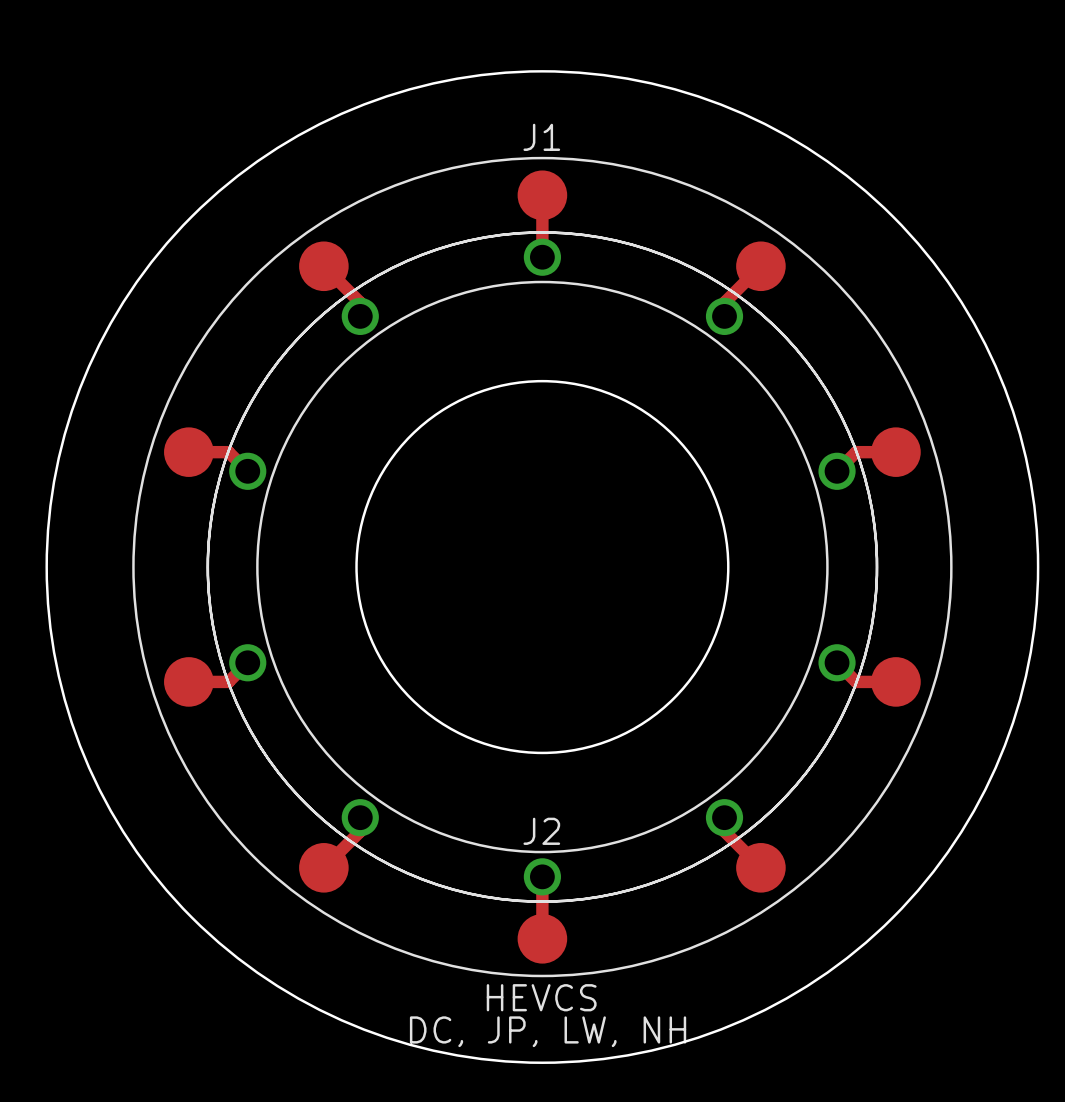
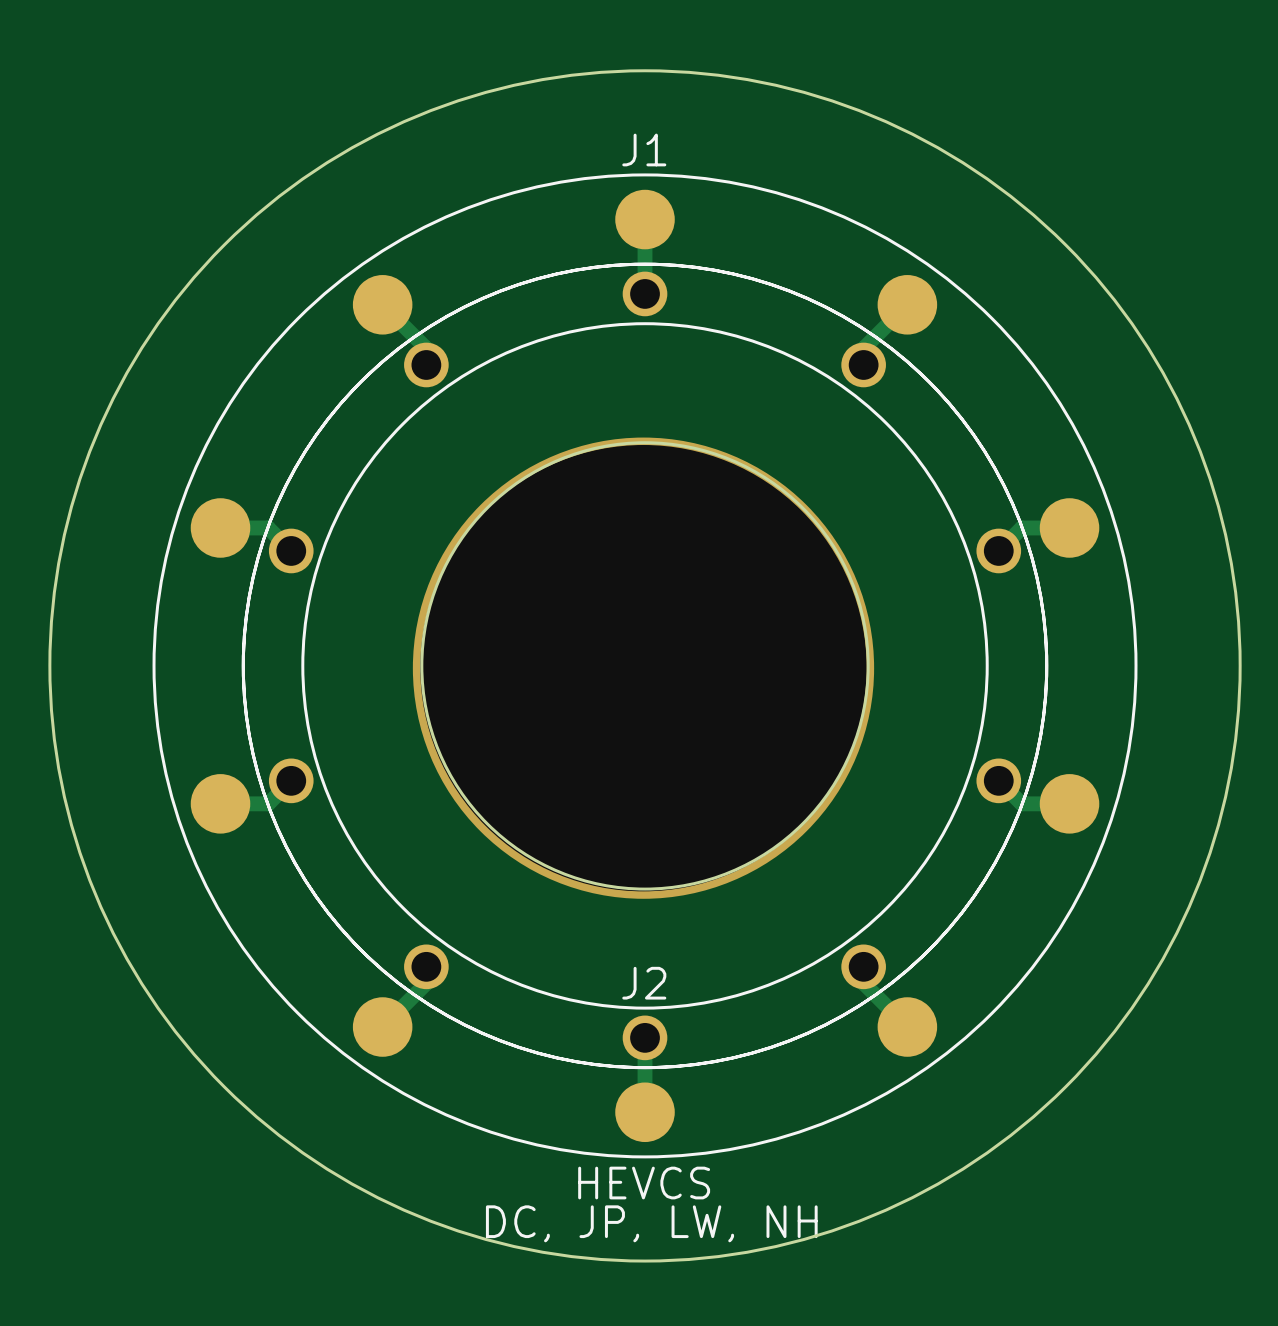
via: none -> (643, 668)

